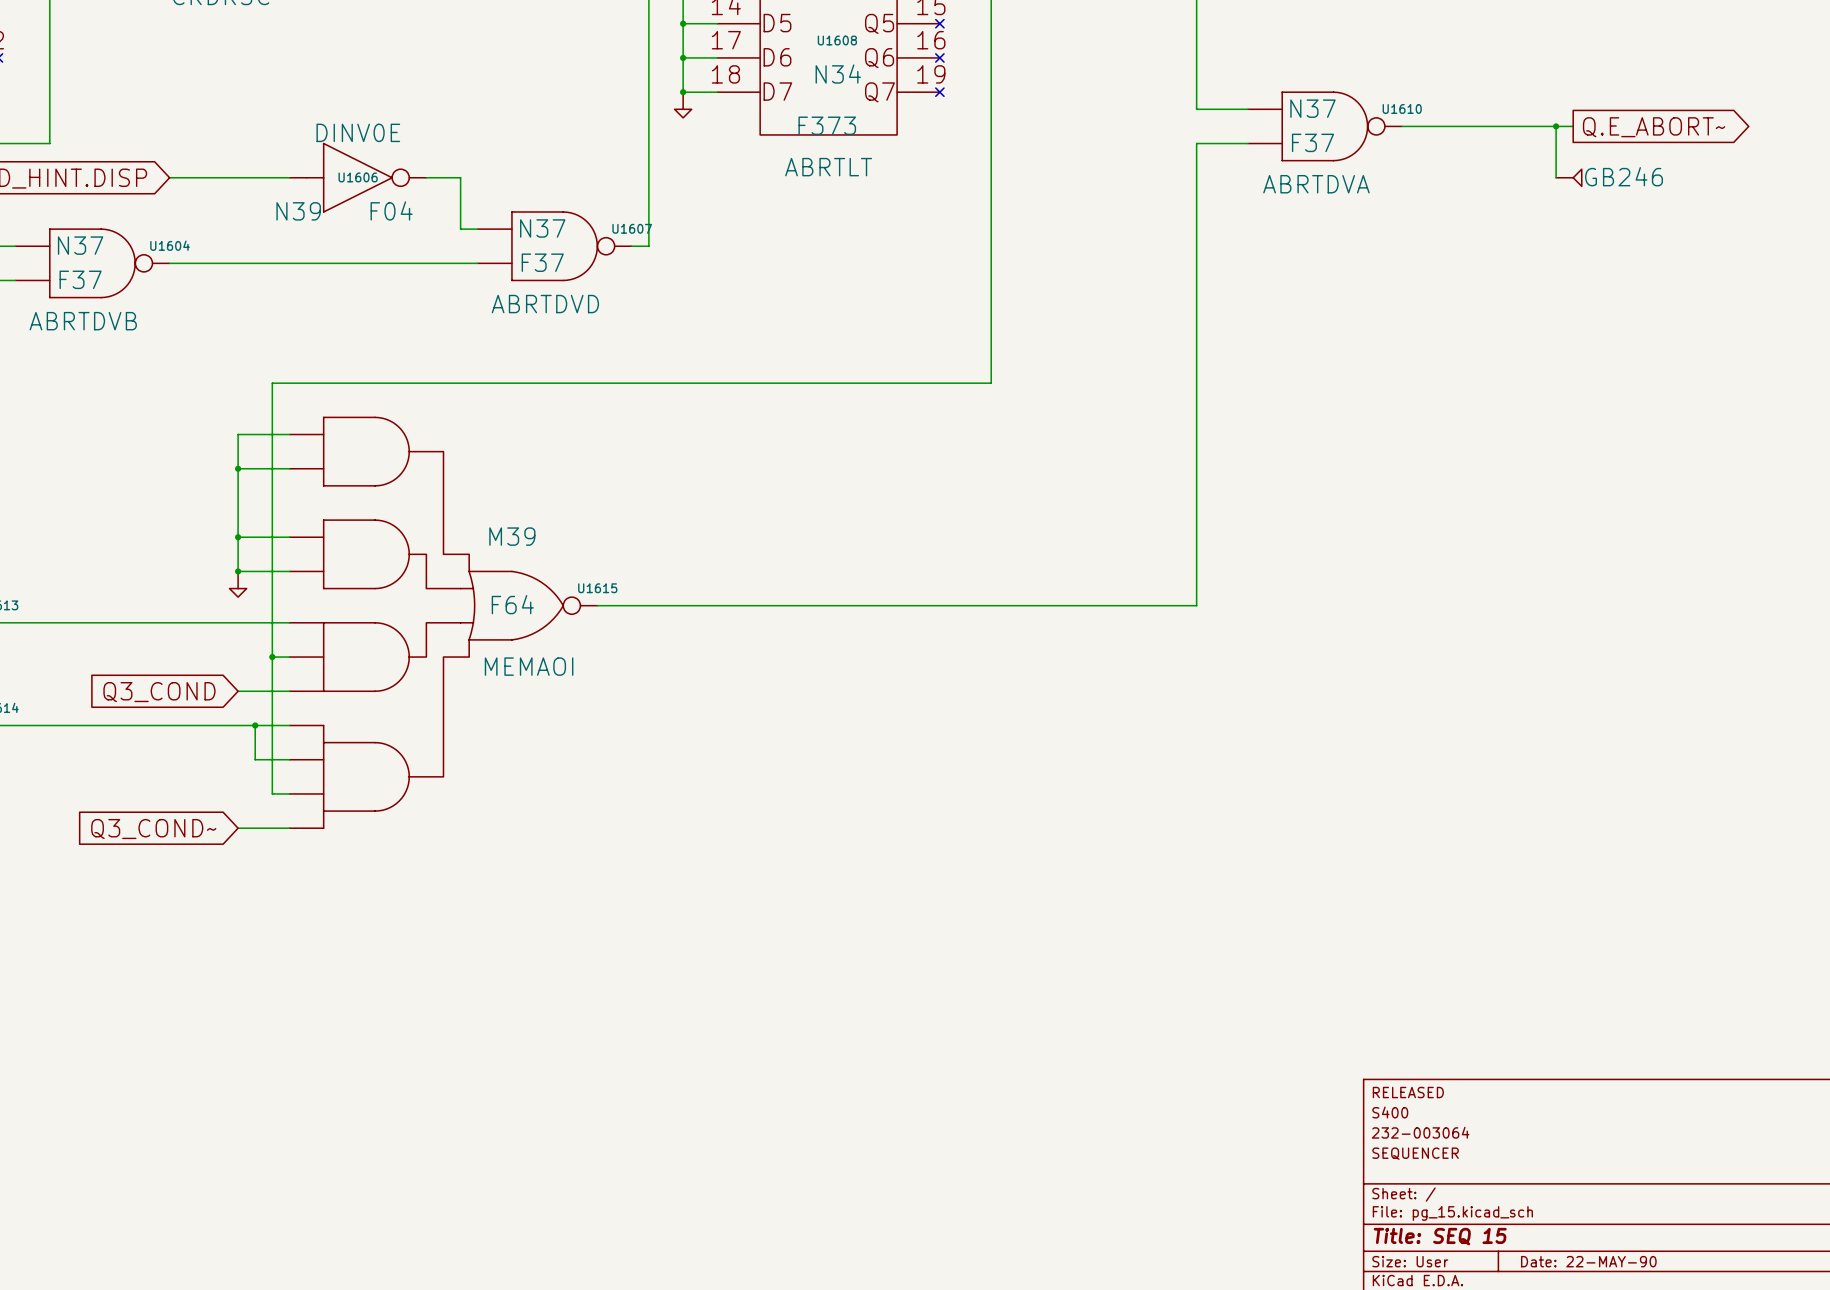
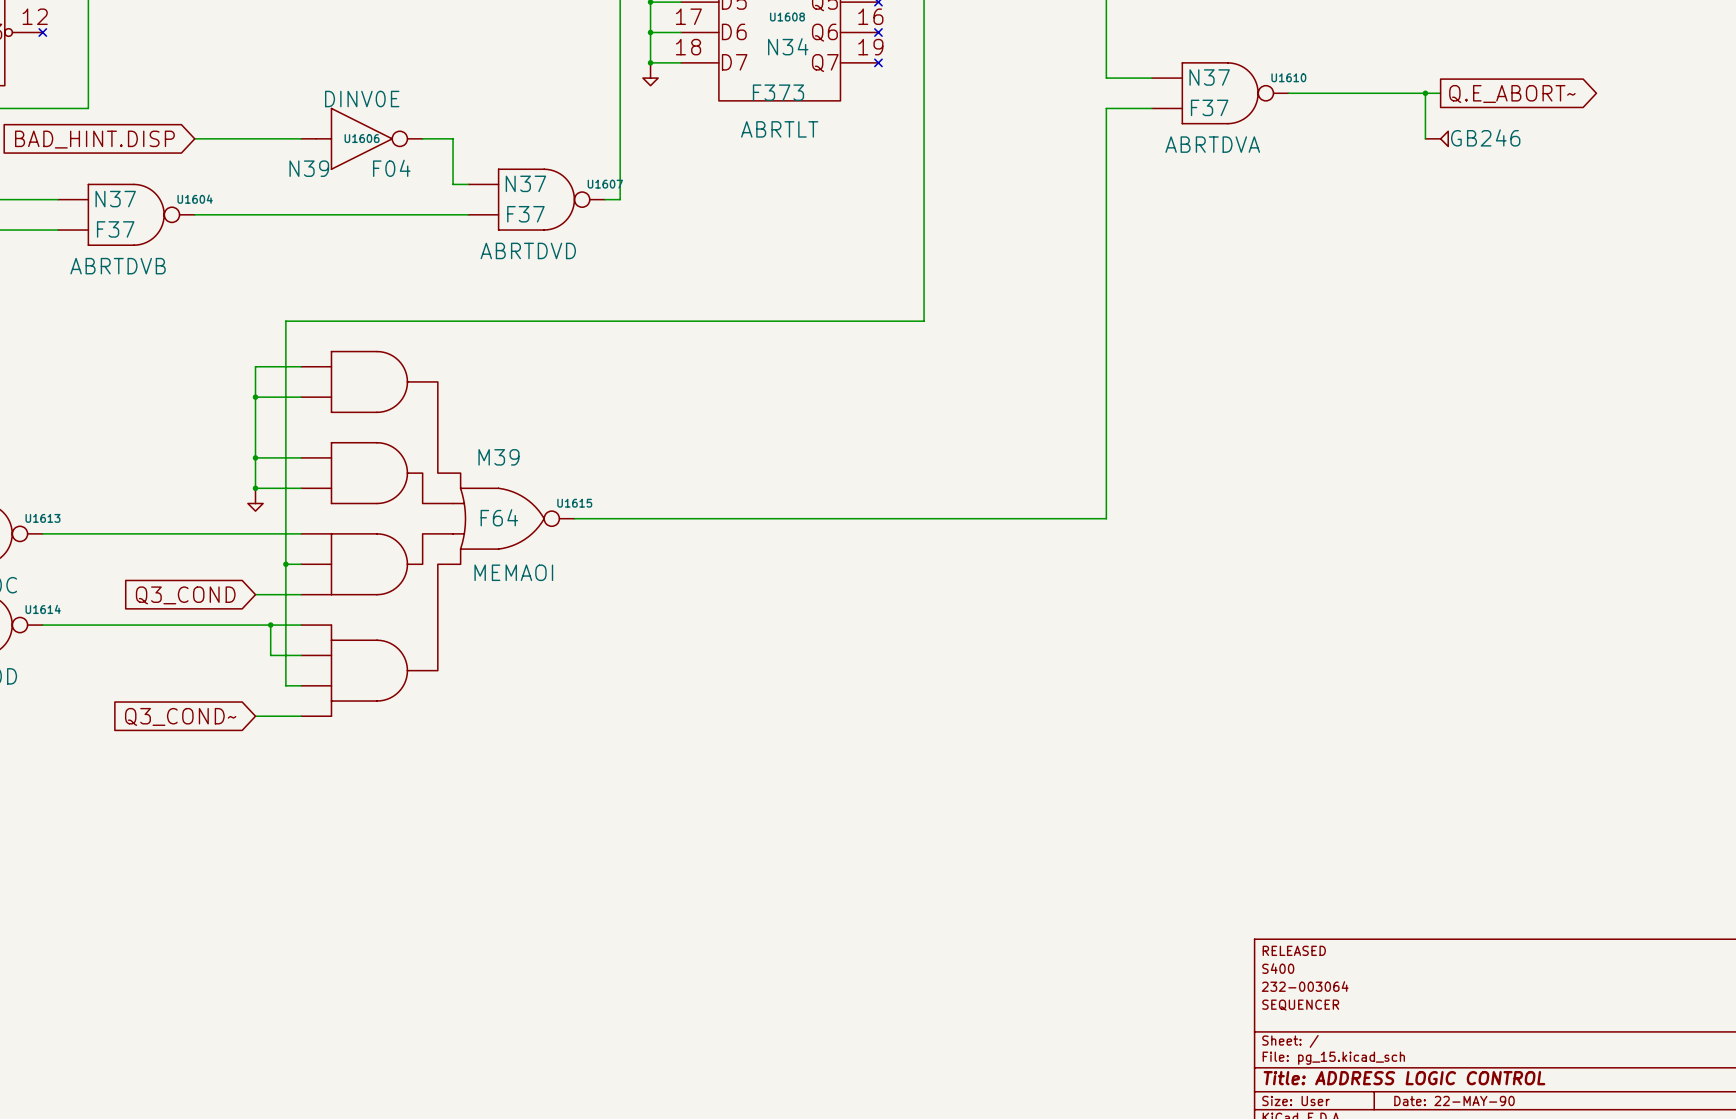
title block: Title: SEQ 15 (1440, 1236) -> Title: ADDRESS LOGIC CONTROL (1404, 1078)

